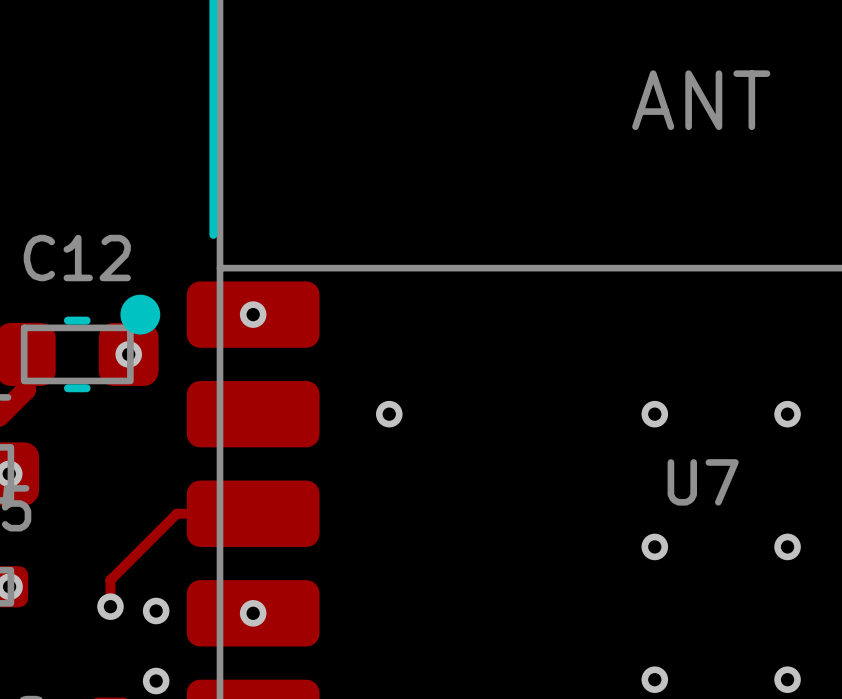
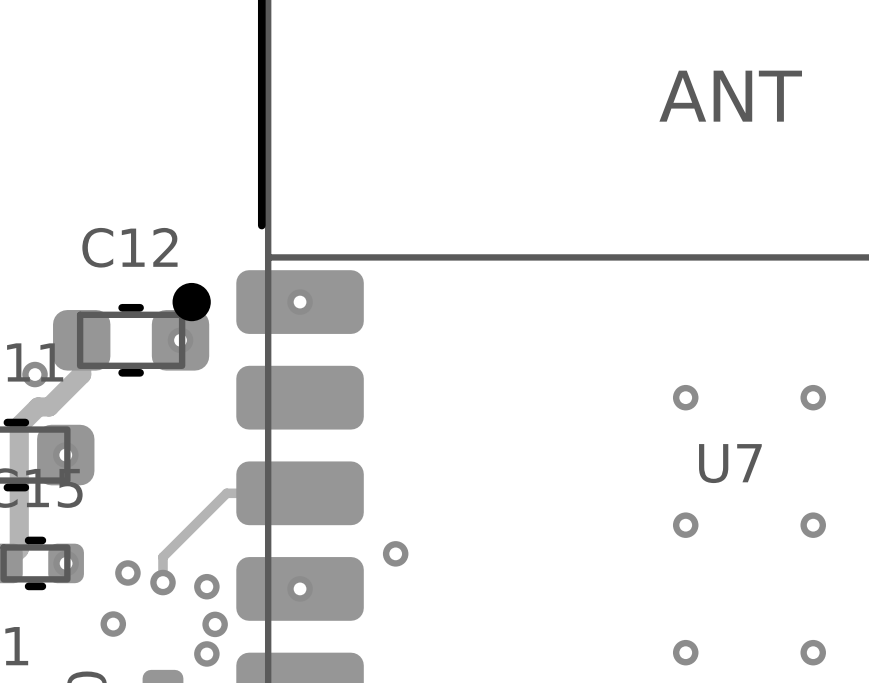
via: (389, 414) -> none
via: none -> (395, 553)
via: none -> (127, 572)
via: none -> (113, 624)
via: none -> (215, 624)

